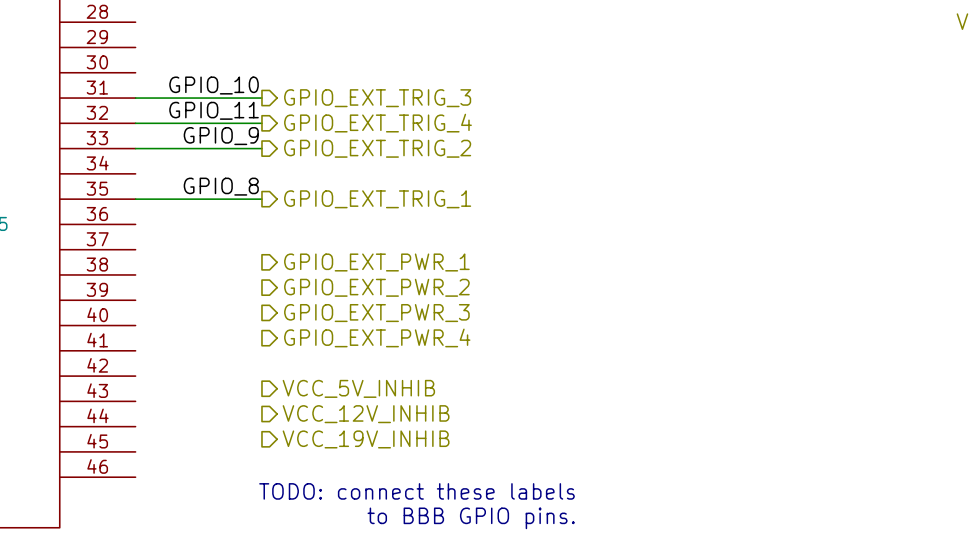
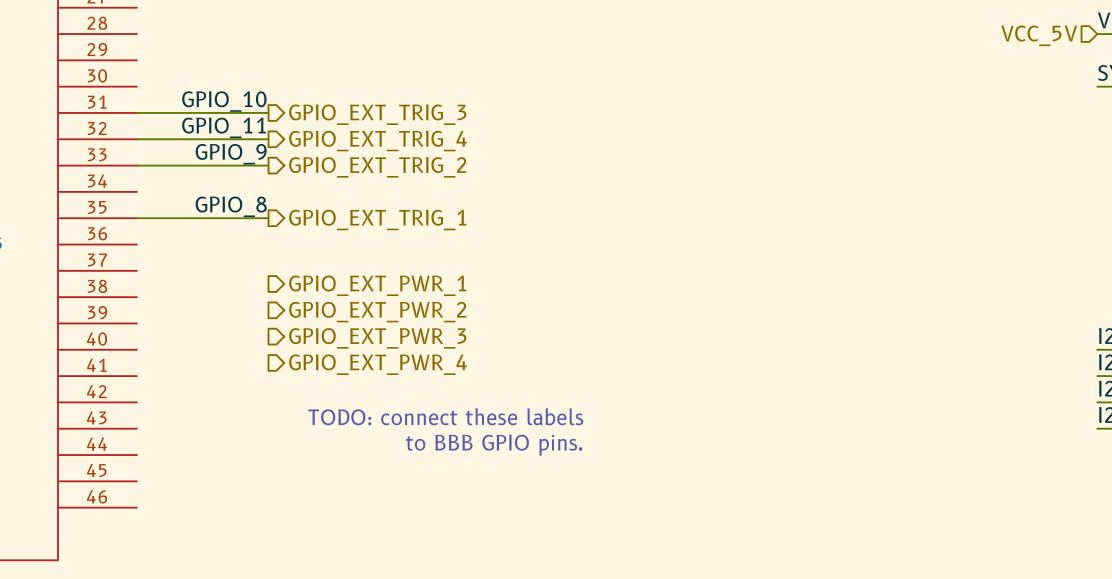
hierarchical label: VCC_5V_INHIB (358, 388) -> none
hierarchical label: VCC_12V_INHIB (366, 414) -> none
hierarchical label: VCC_19V_INHIB (366, 439) -> none
text position: TODO: connect these labels (416, 491) -> TODO: connect these labels (445, 416)
text position: to BBB GPIO pins. (471, 518) -> to BBB GPIO pins. (494, 445)

